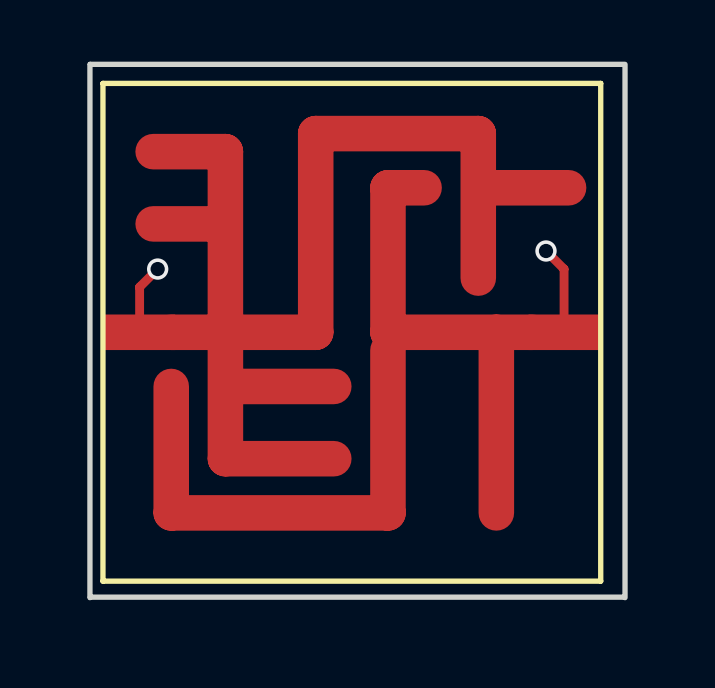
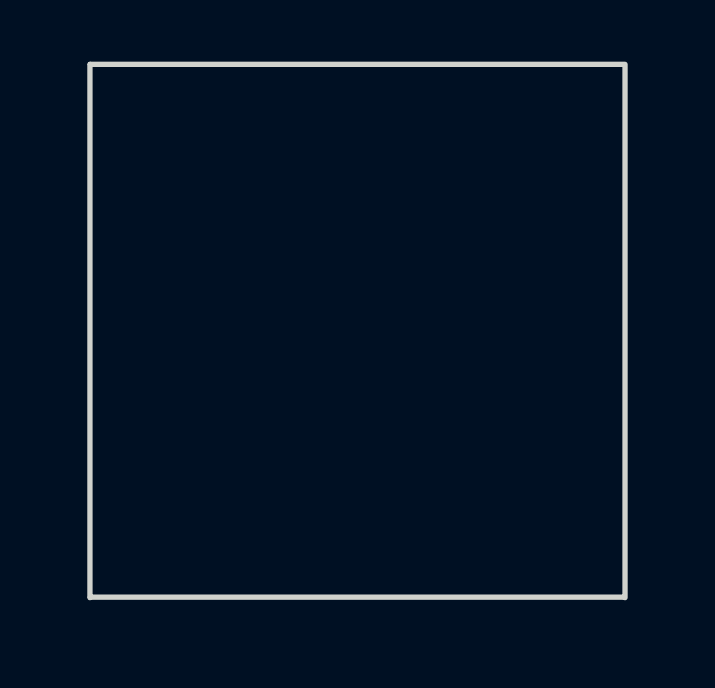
track: (546, 250) (564, 269) (564, 332) -> none
via: (546, 250) -> none
track: (157, 269) (139, 287) (139, 332) -> none
via: (157, 269) -> none
part: (351, 332) -> none

